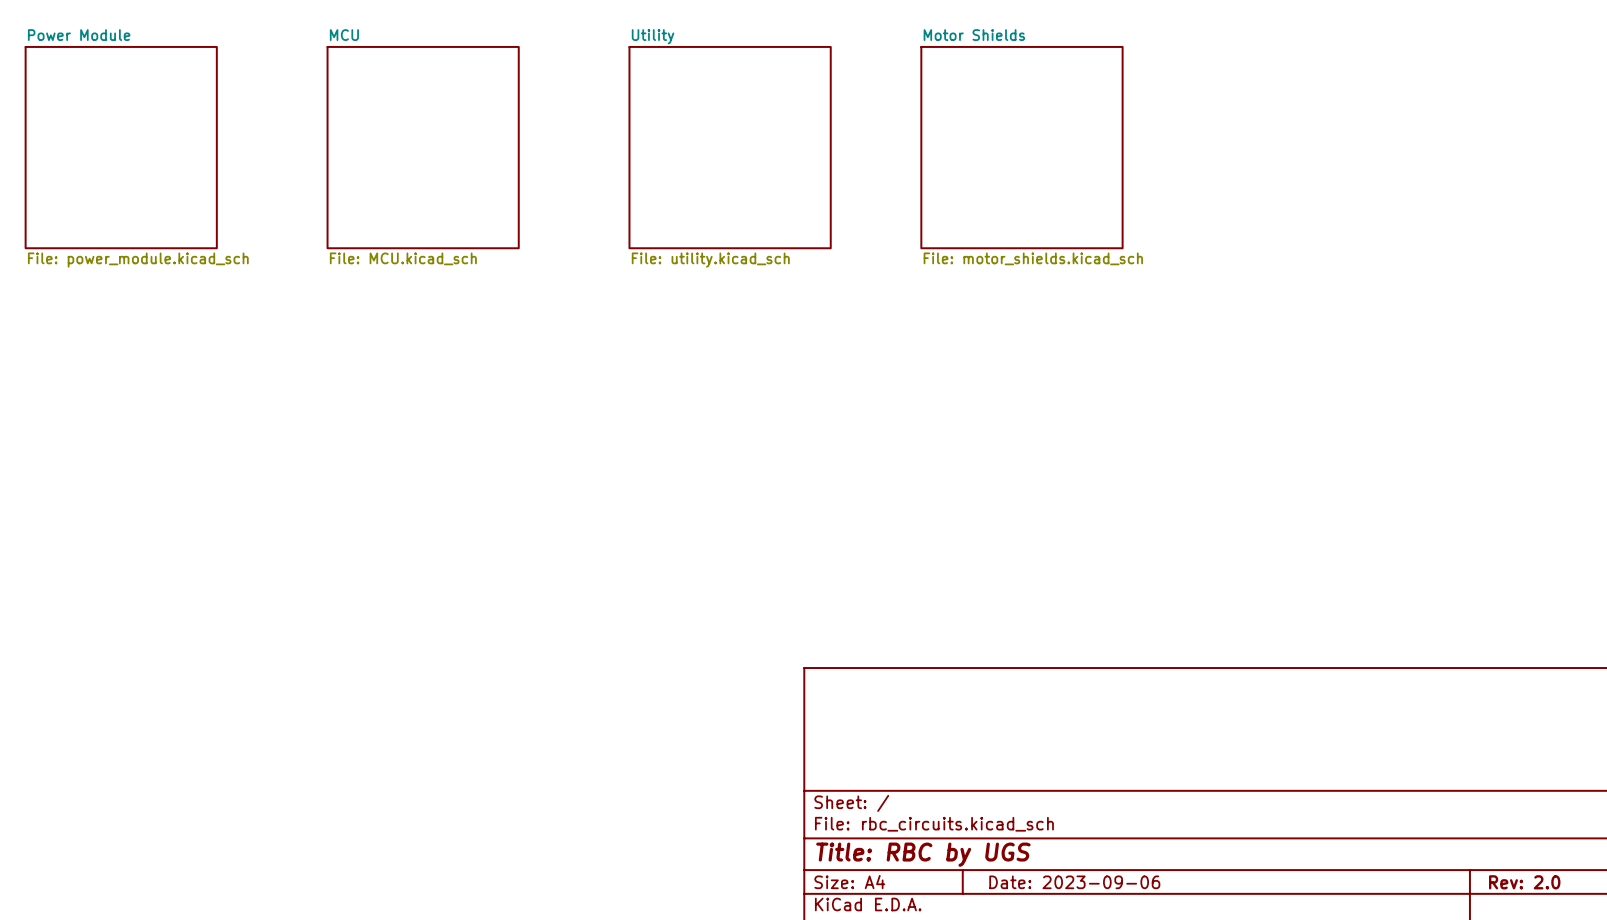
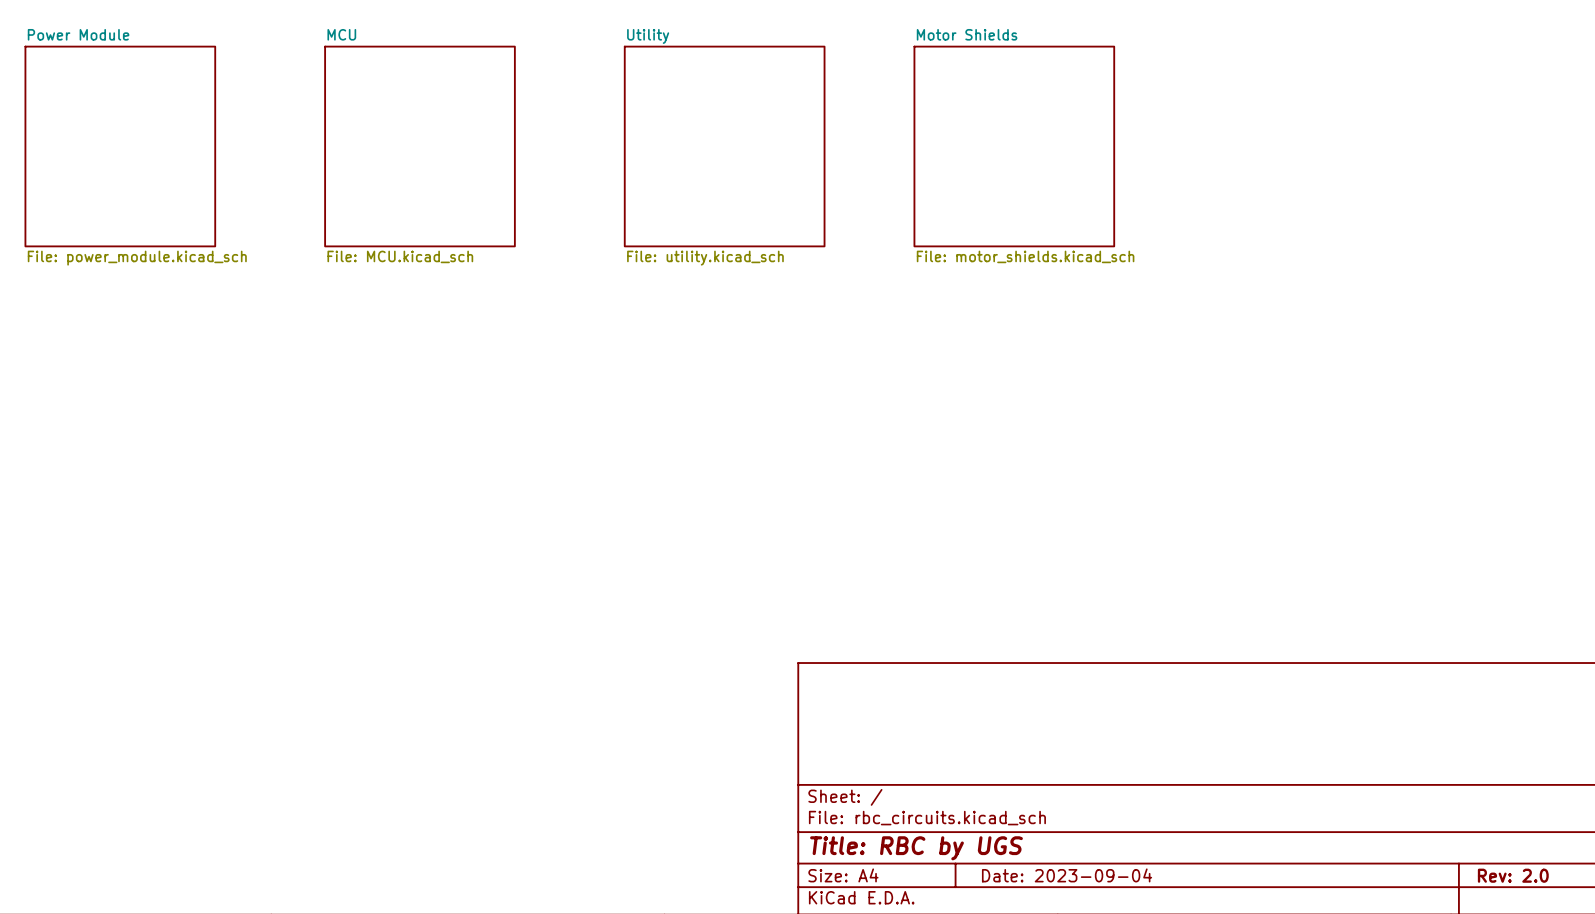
title block: Date: 2023-09-06 (1074, 882) -> Date: 2023-09-04 (1067, 875)

